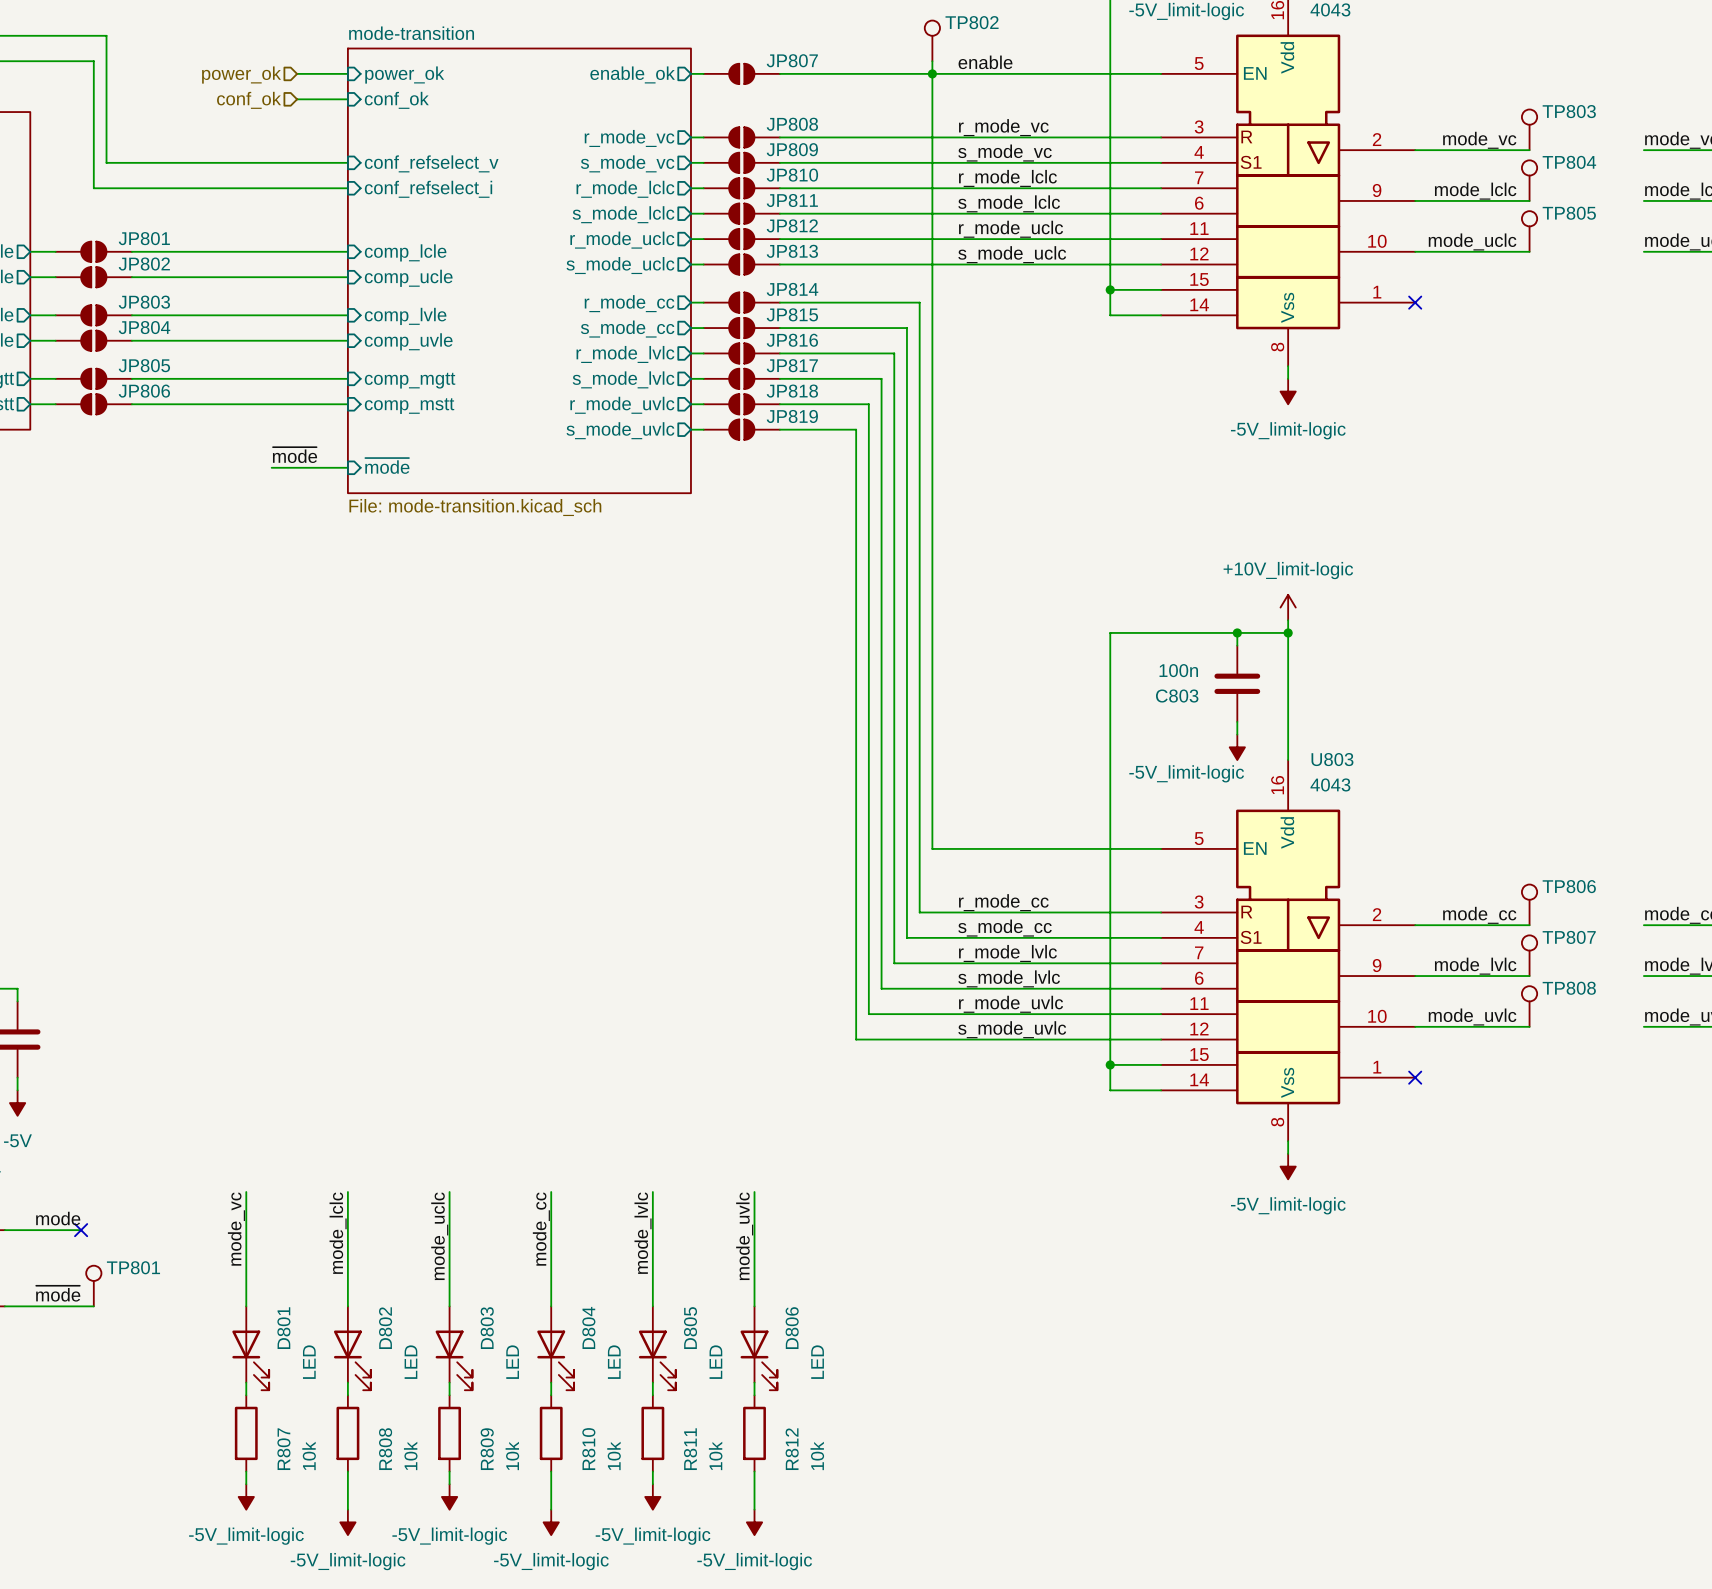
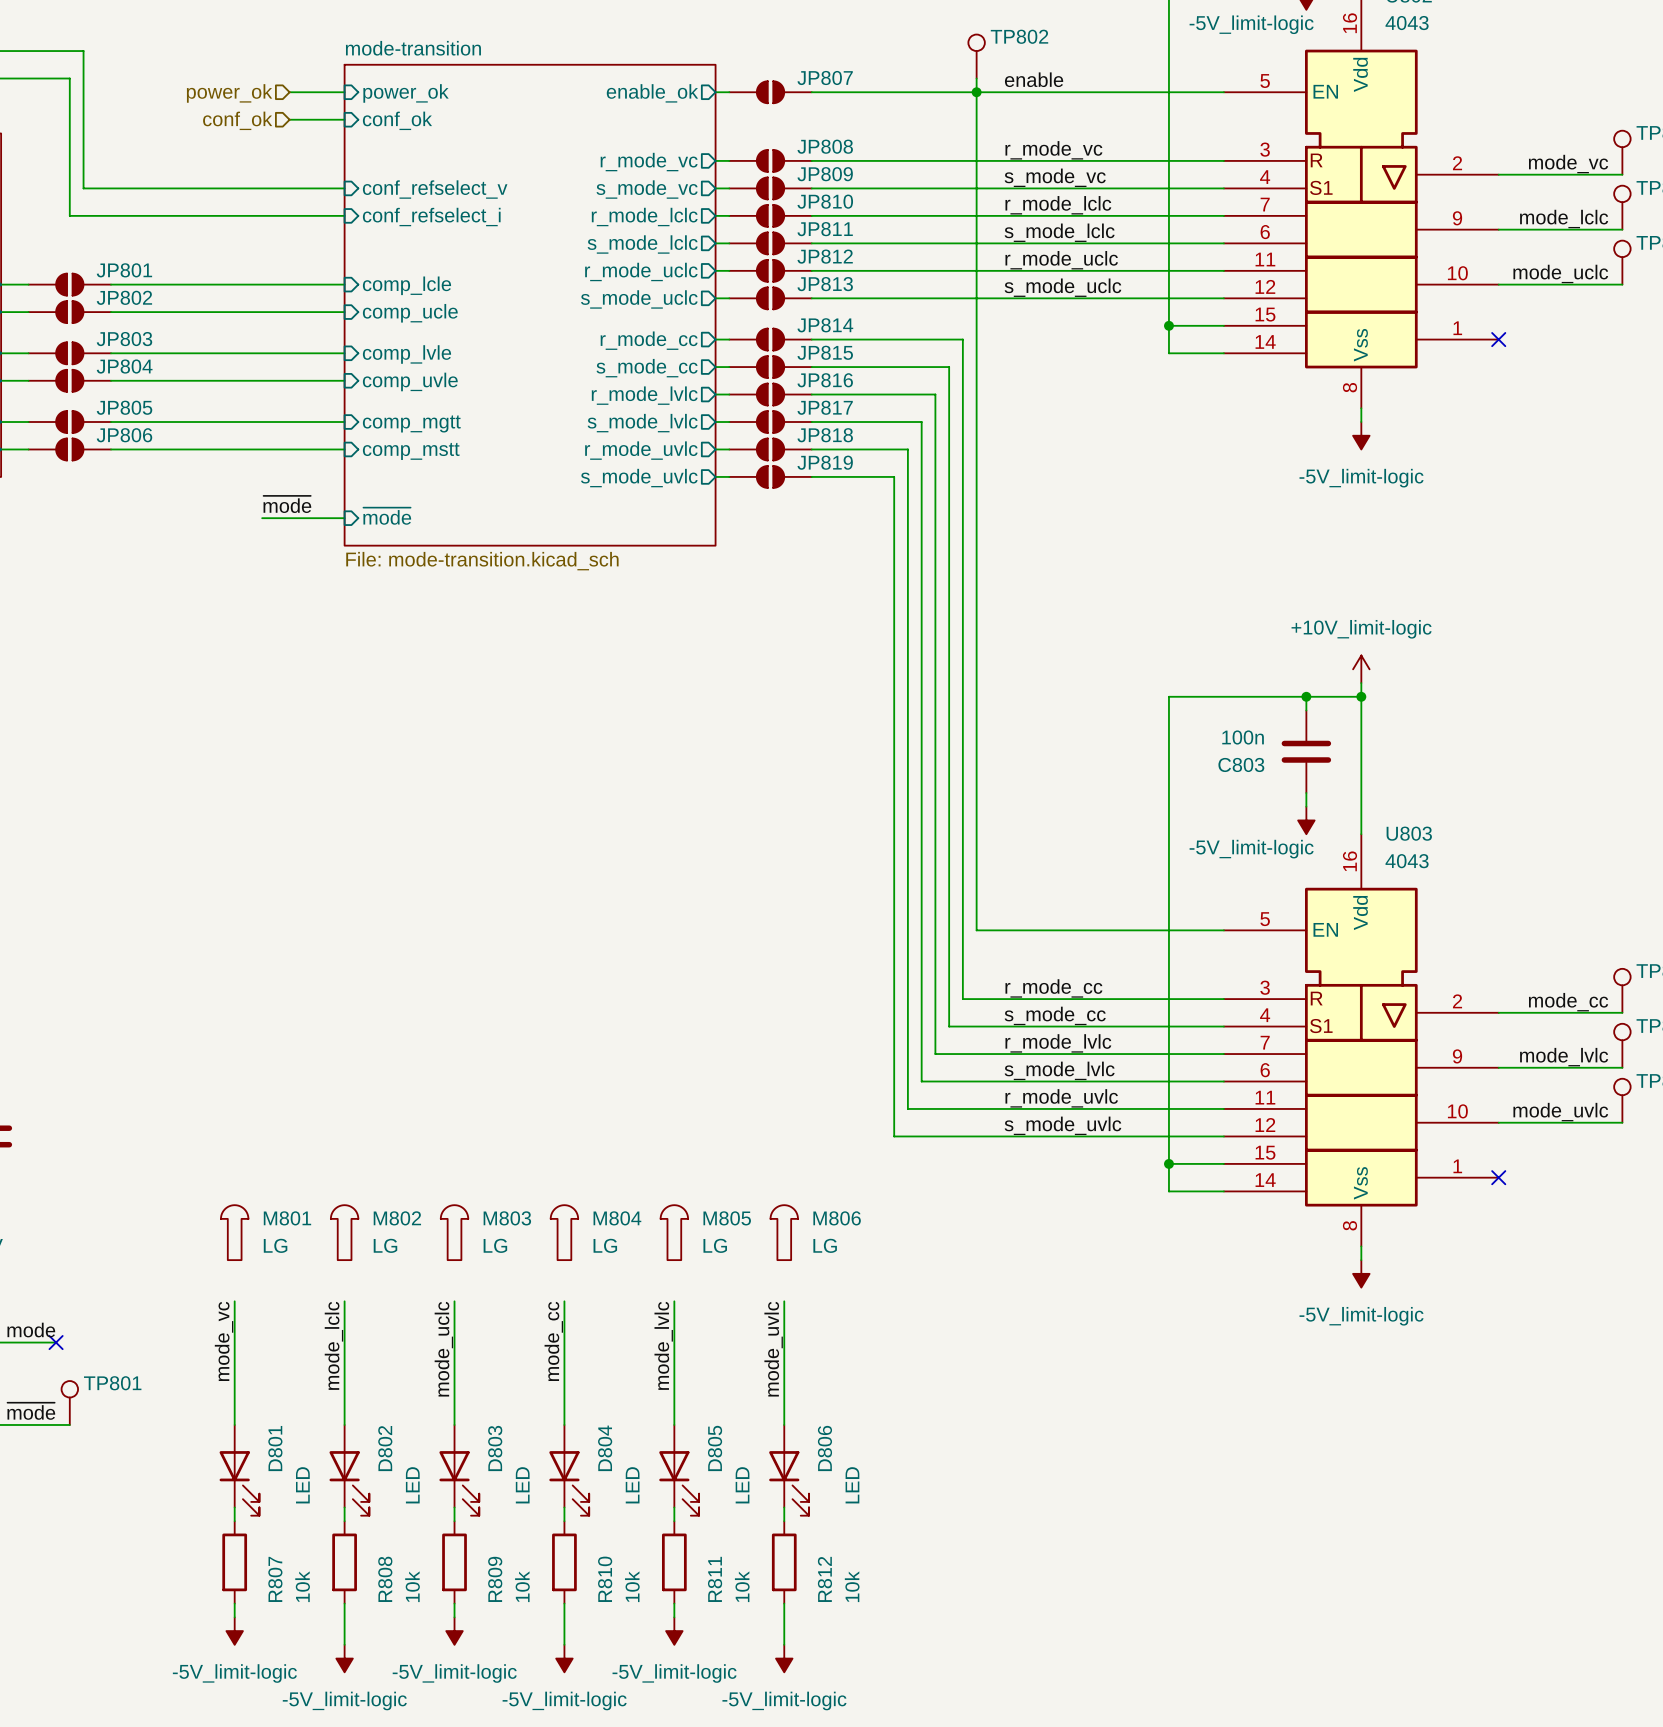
M801: none -> LG (234, 1232)
M802: none -> LG (344, 1232)
M803: none -> LG (454, 1232)
M804: none -> LG (564, 1232)
M805: none -> LG (674, 1232)
M806: none -> LG (784, 1232)

